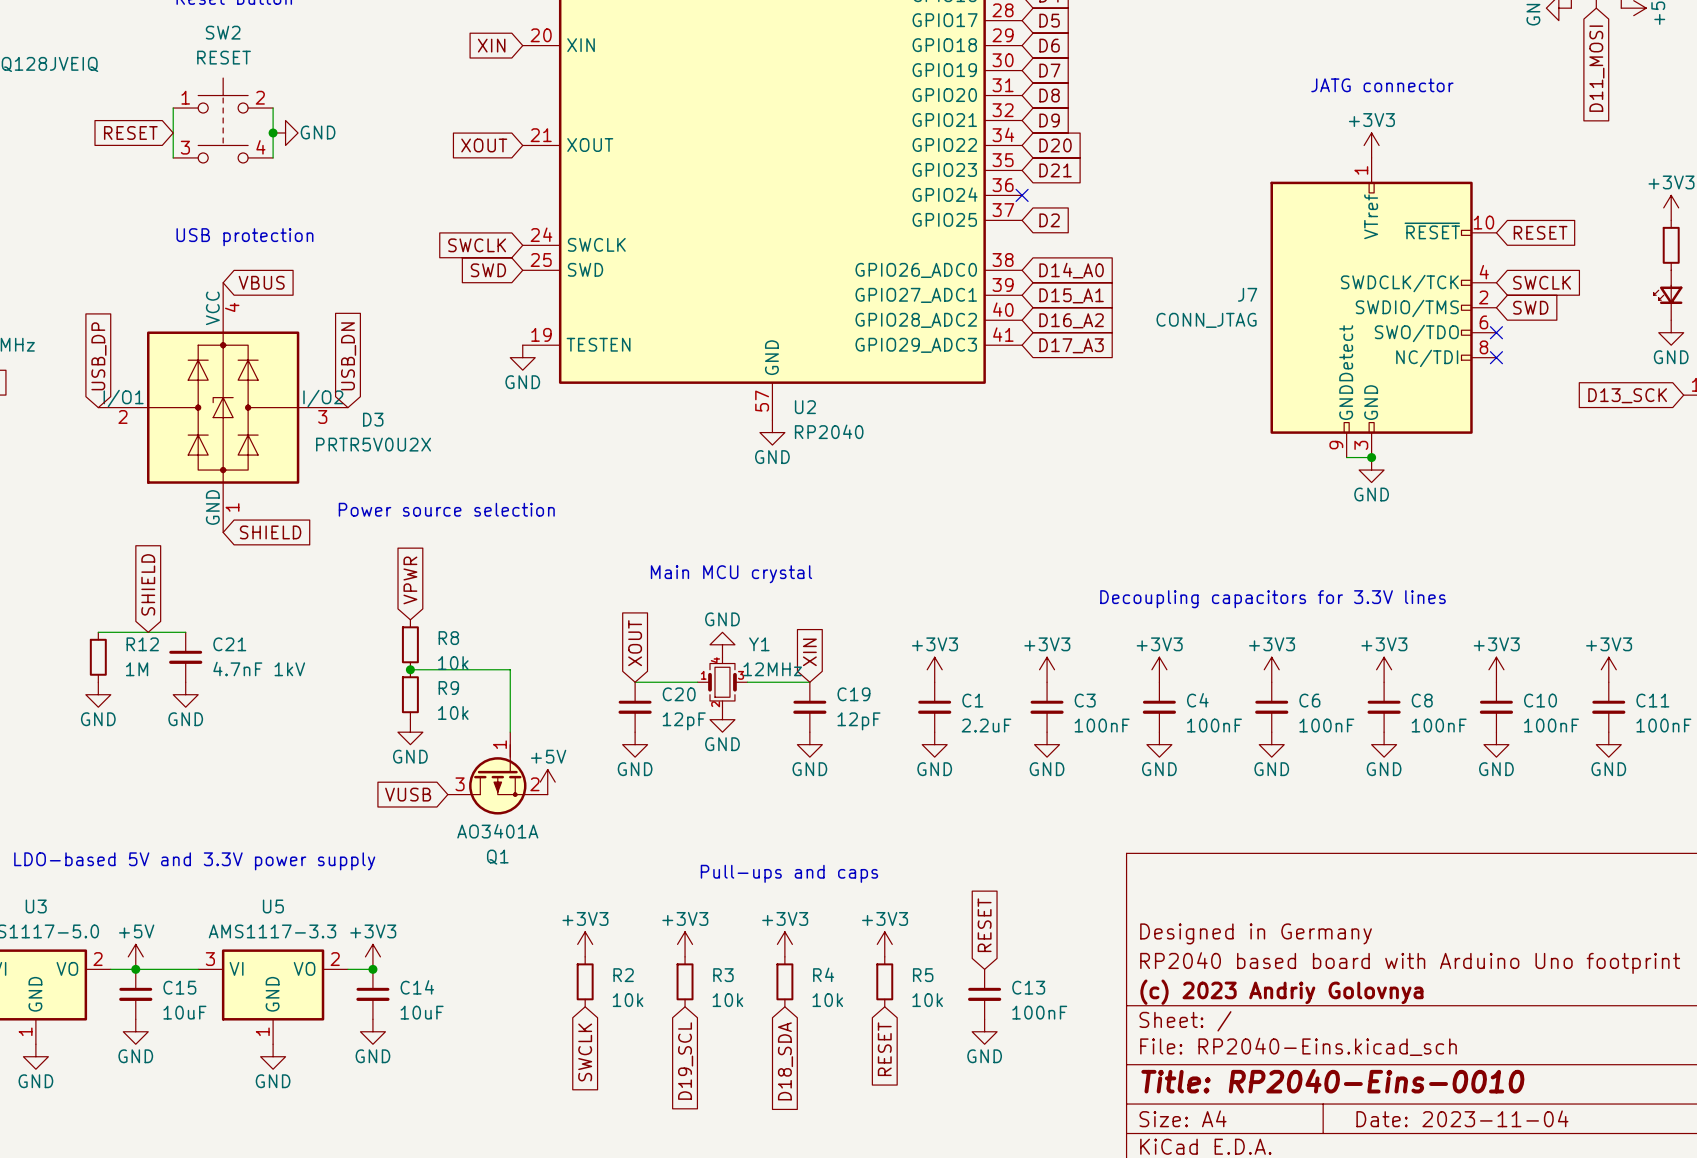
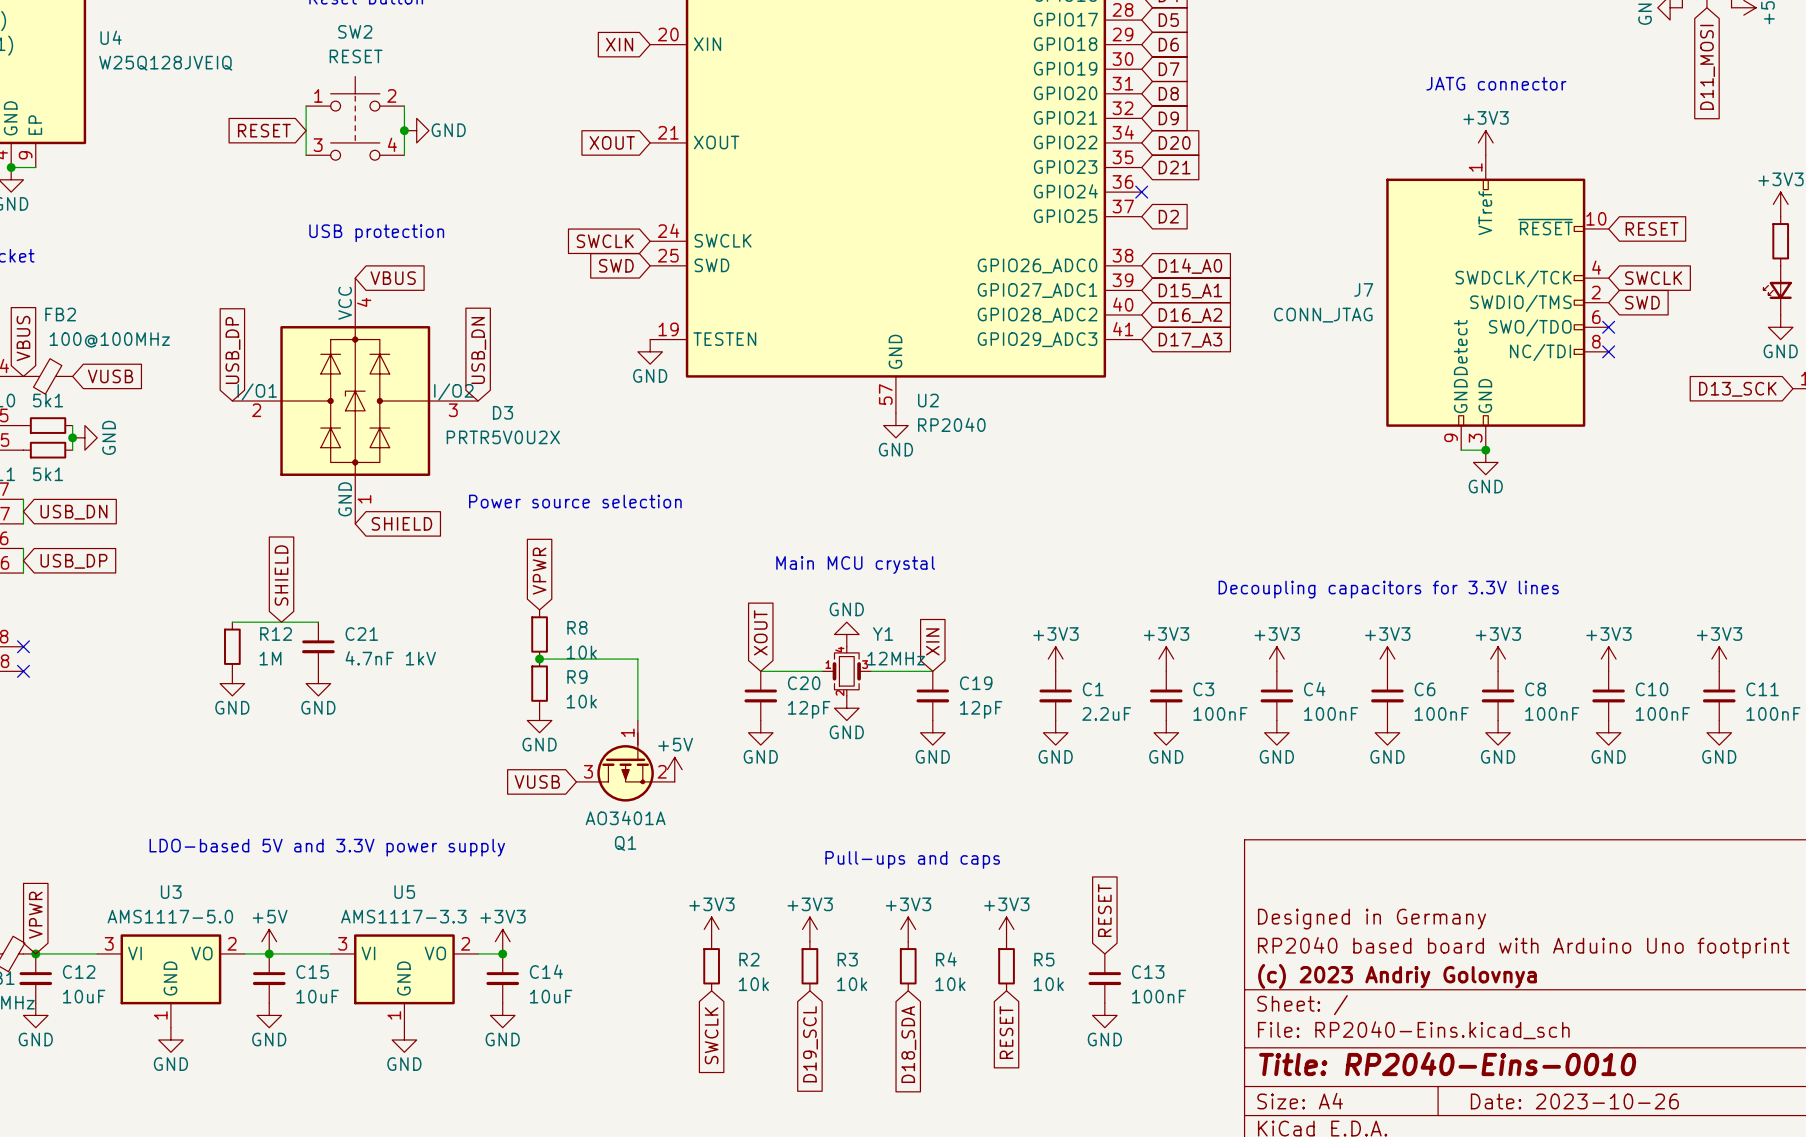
title block: Date: 2023-11-04 (1462, 1118) -> Date: 2023-10-26 (1574, 1101)

